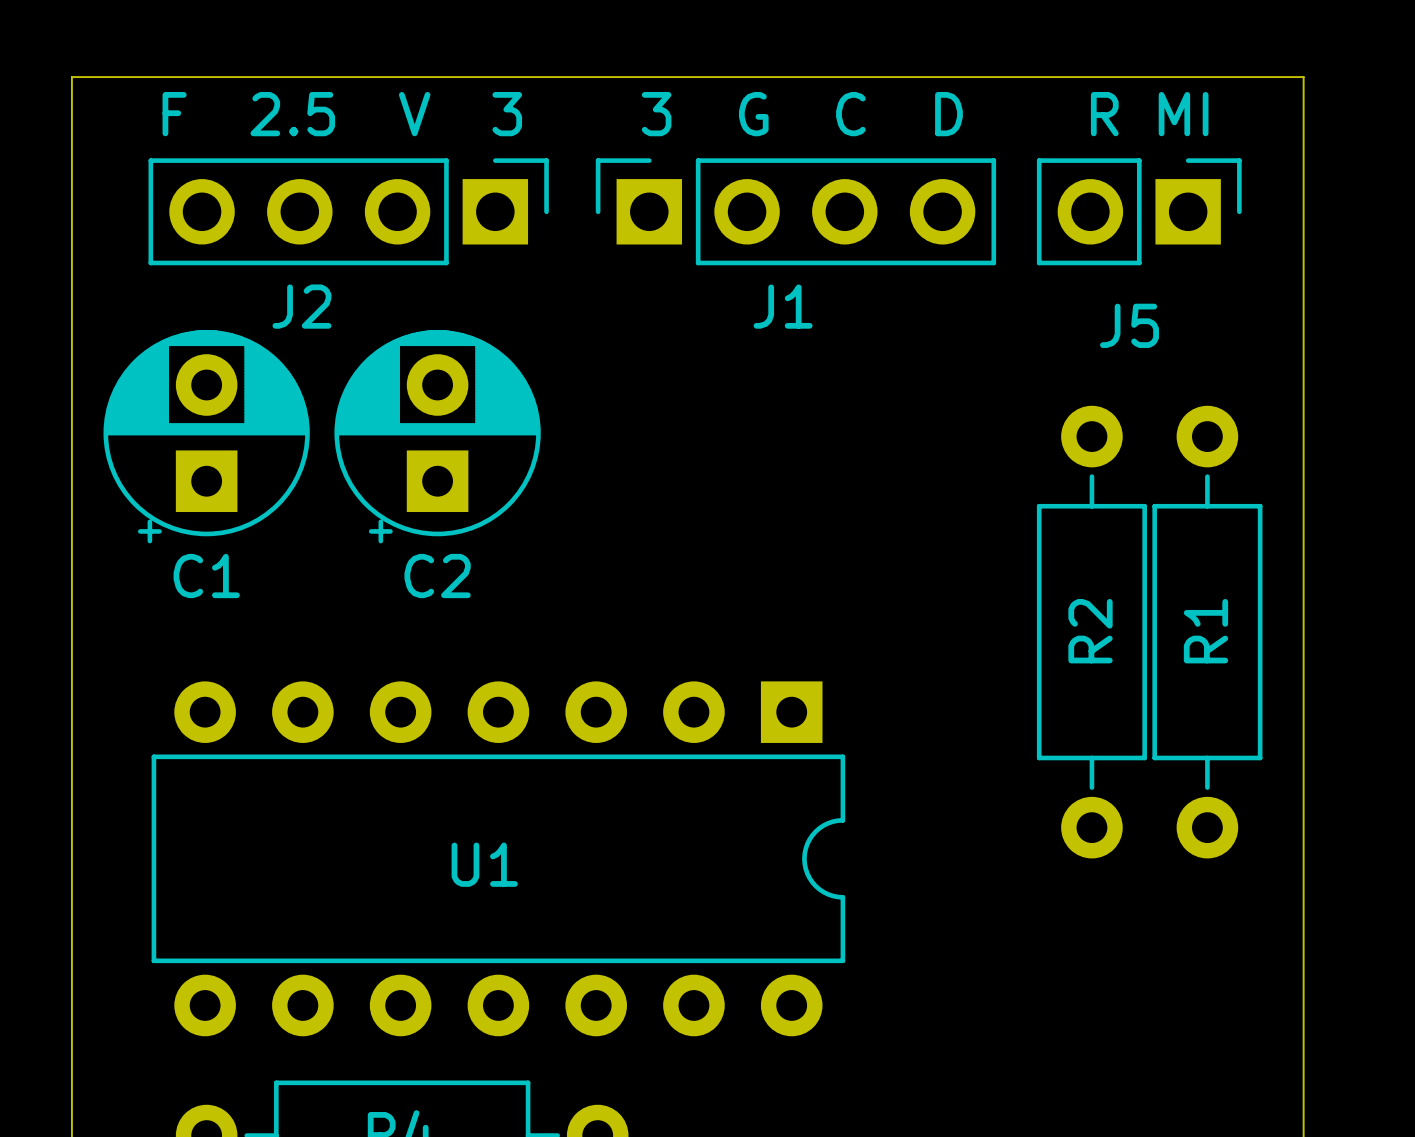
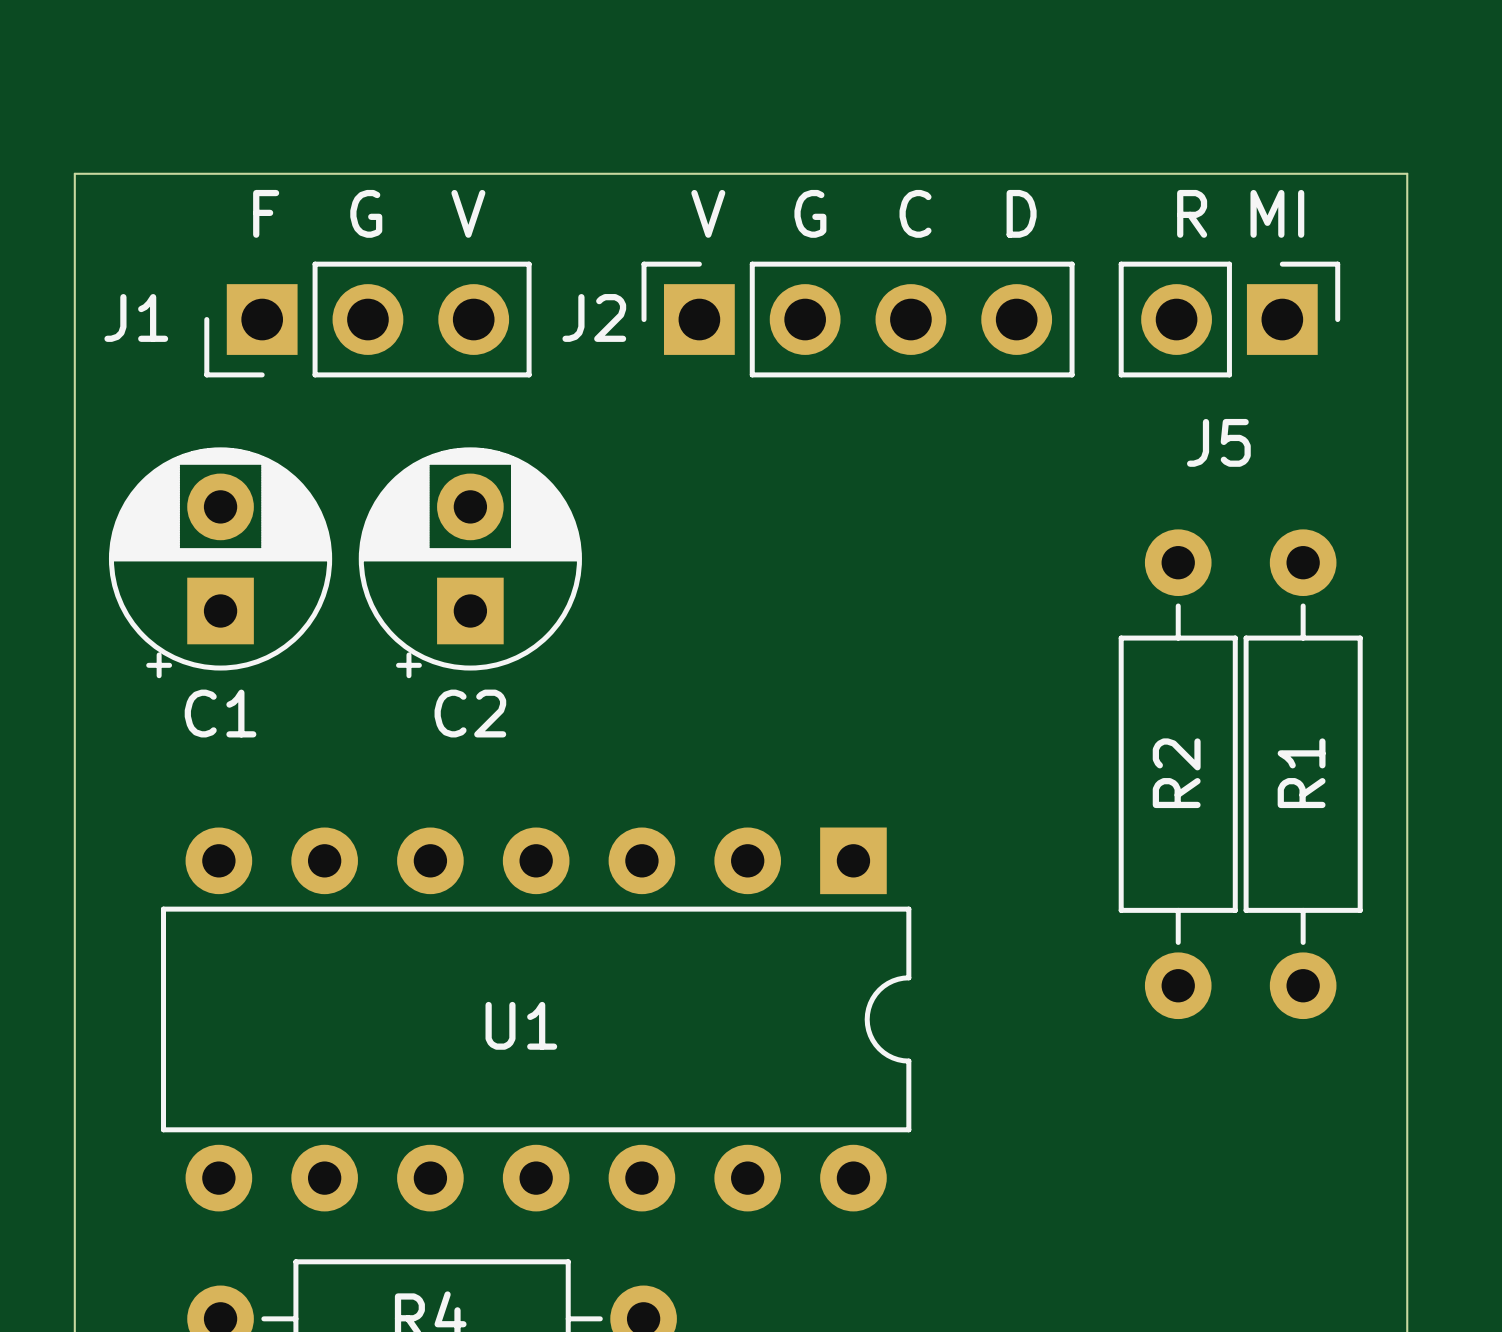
text: F 2.5 V 3 (342, 114) -> F G V (369, 213)
text: 3 G C D (802, 114) -> V G C D (863, 213)
J1 footprint: [148, 158, 549, 266] -> [204, 261, 532, 378]
J2 name position: J2 (301, 306) -> J2 (594, 317)
J1 name position: J1 (783, 306) -> J1 (136, 317)

